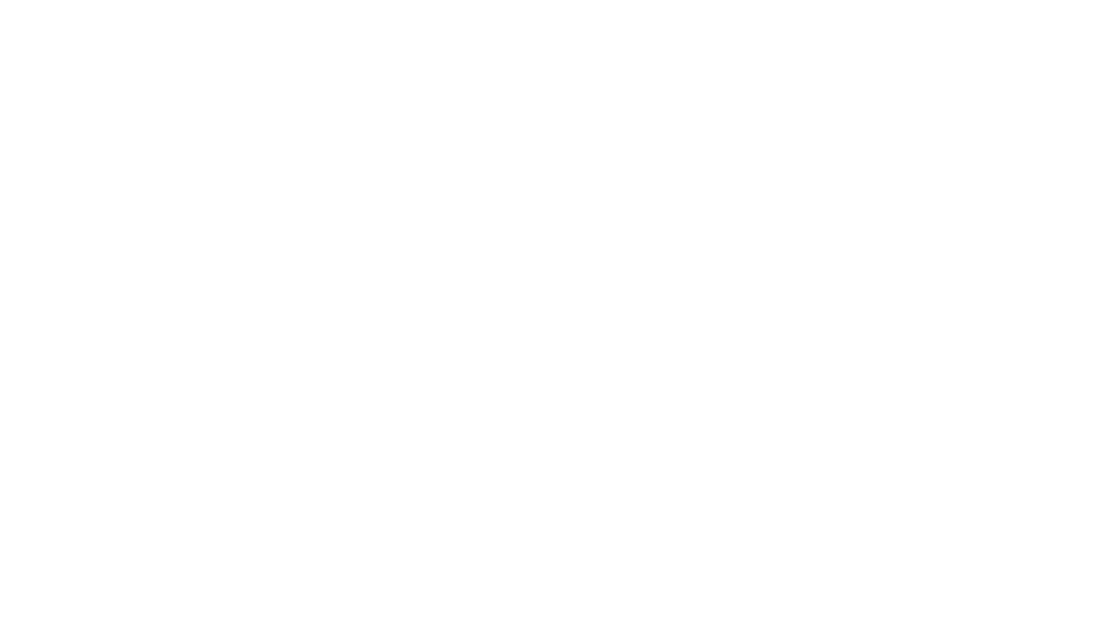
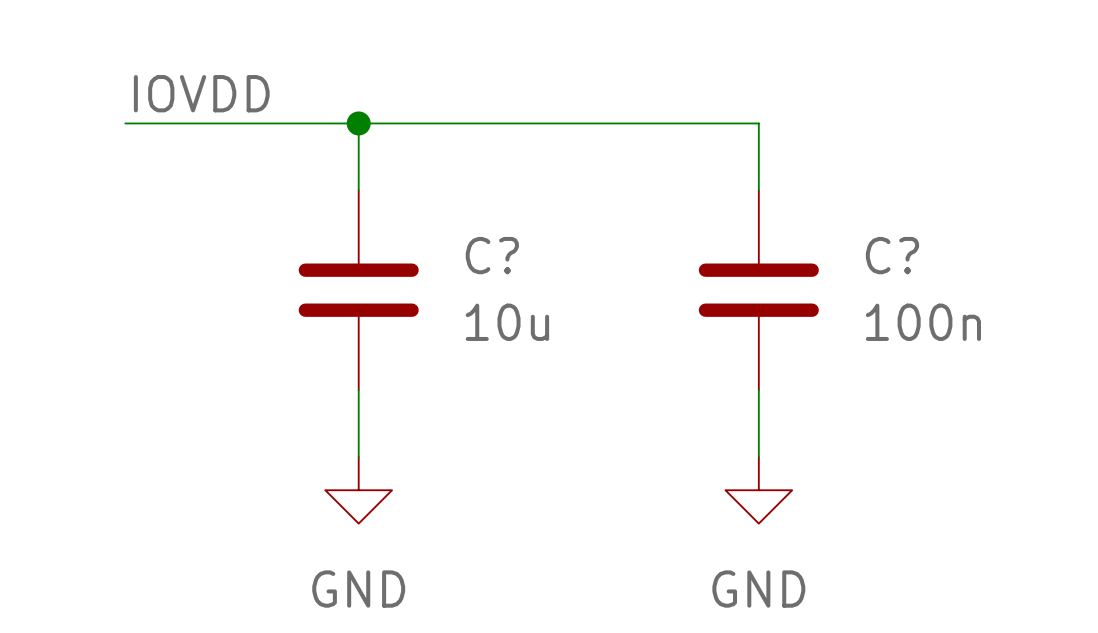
label: none -> IOVDD (201, 93)
wire: none -> (125, 123) (758, 123) (758, 190)
wire: none -> (358, 123) (358, 190)
junction: none -> (358, 123)
C?: none -> 10u (358, 290)
C?: none -> 100n (758, 290)
wire: none -> (358, 390) (358, 456)
wire: none -> (758, 390) (758, 456)
power symbol: none -> GND (358, 490)
power symbol: none -> GND (758, 490)

